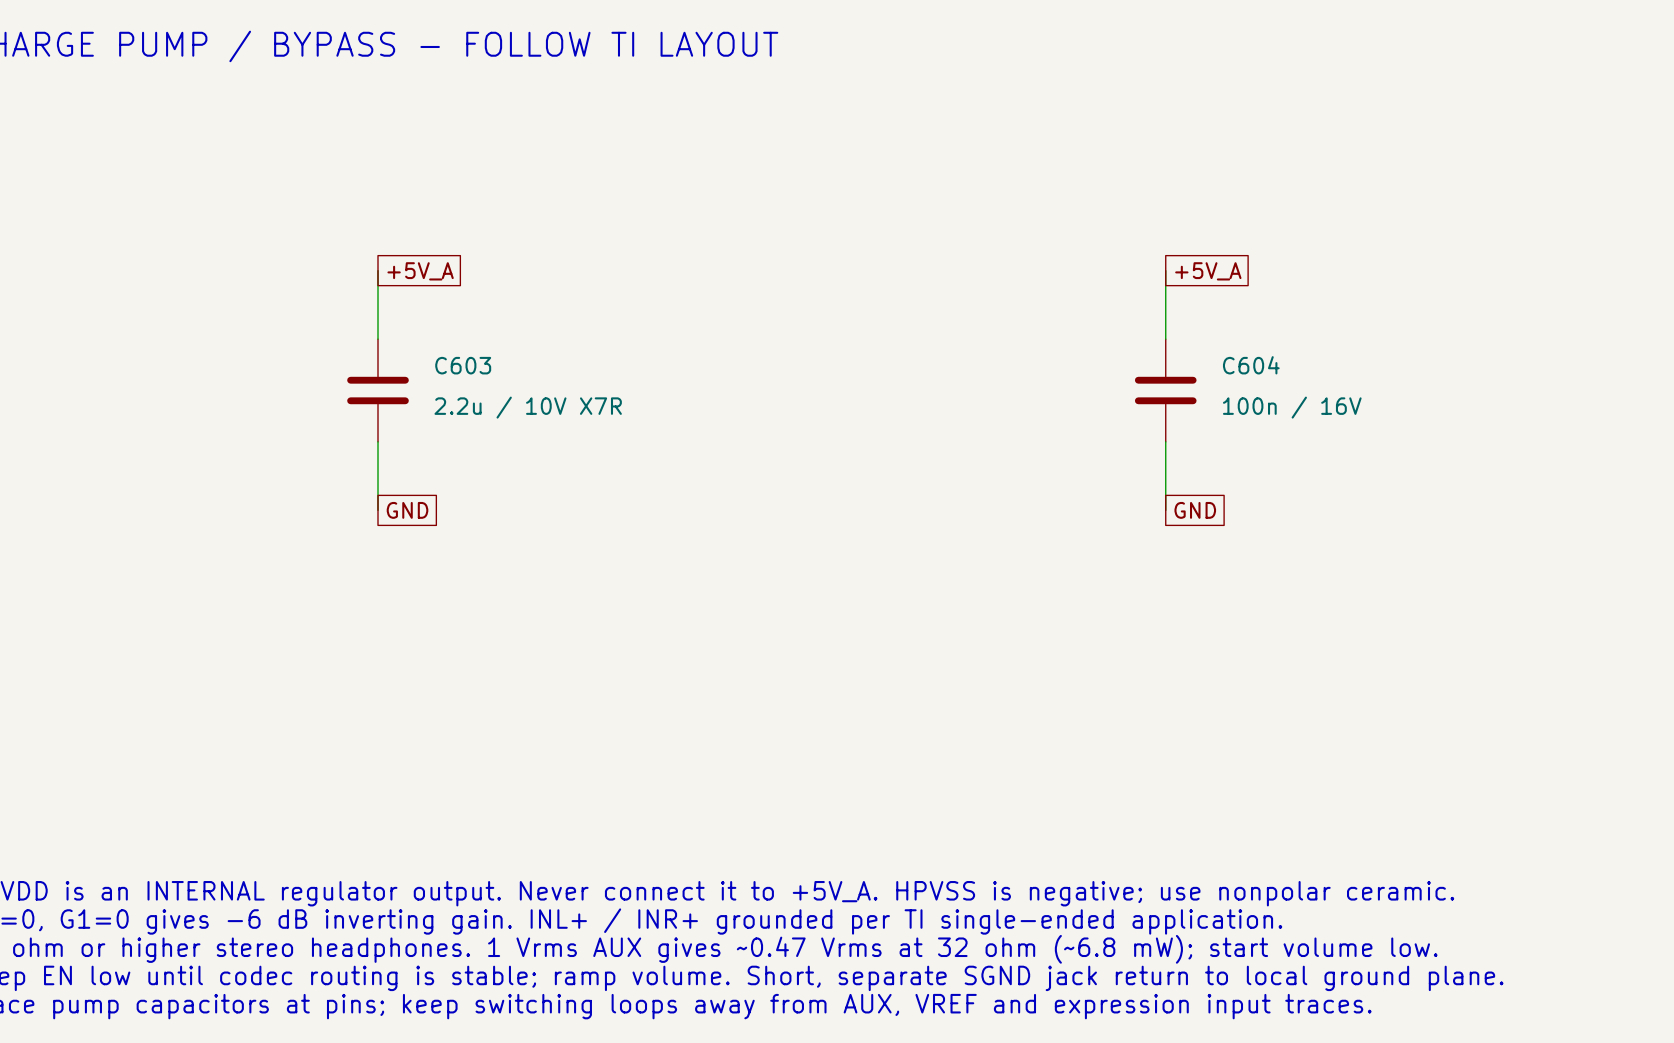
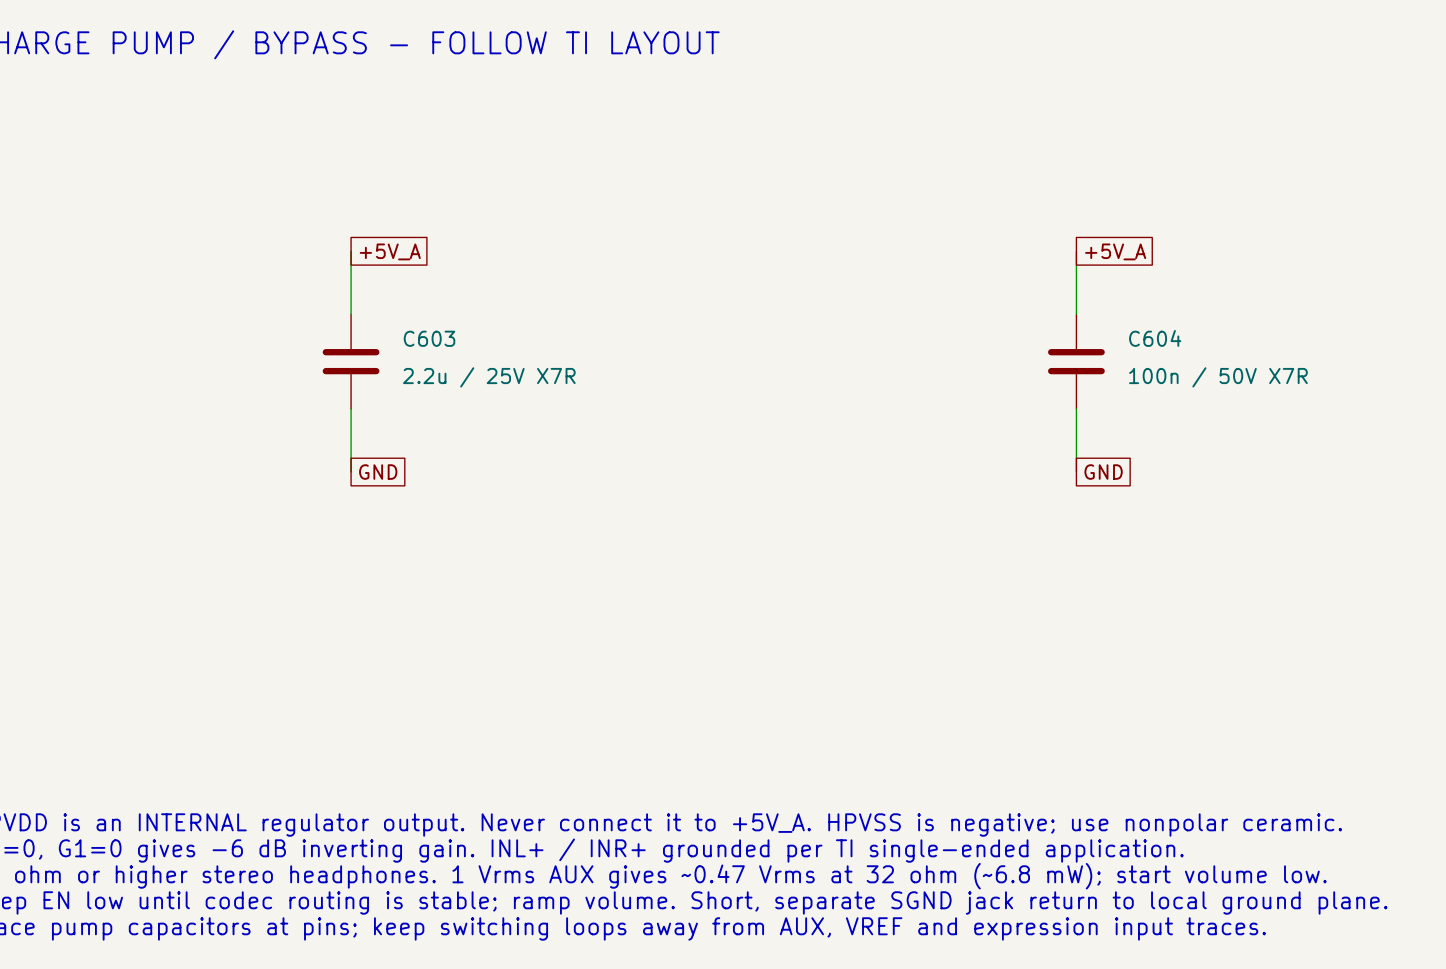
C603 value: 2.2u / 10V X7R (528, 407) -> 2.2u / 25V X7R (489, 377)
C604 value: 100n / 16V (1292, 407) -> 100n / 50V X7R (1218, 377)

